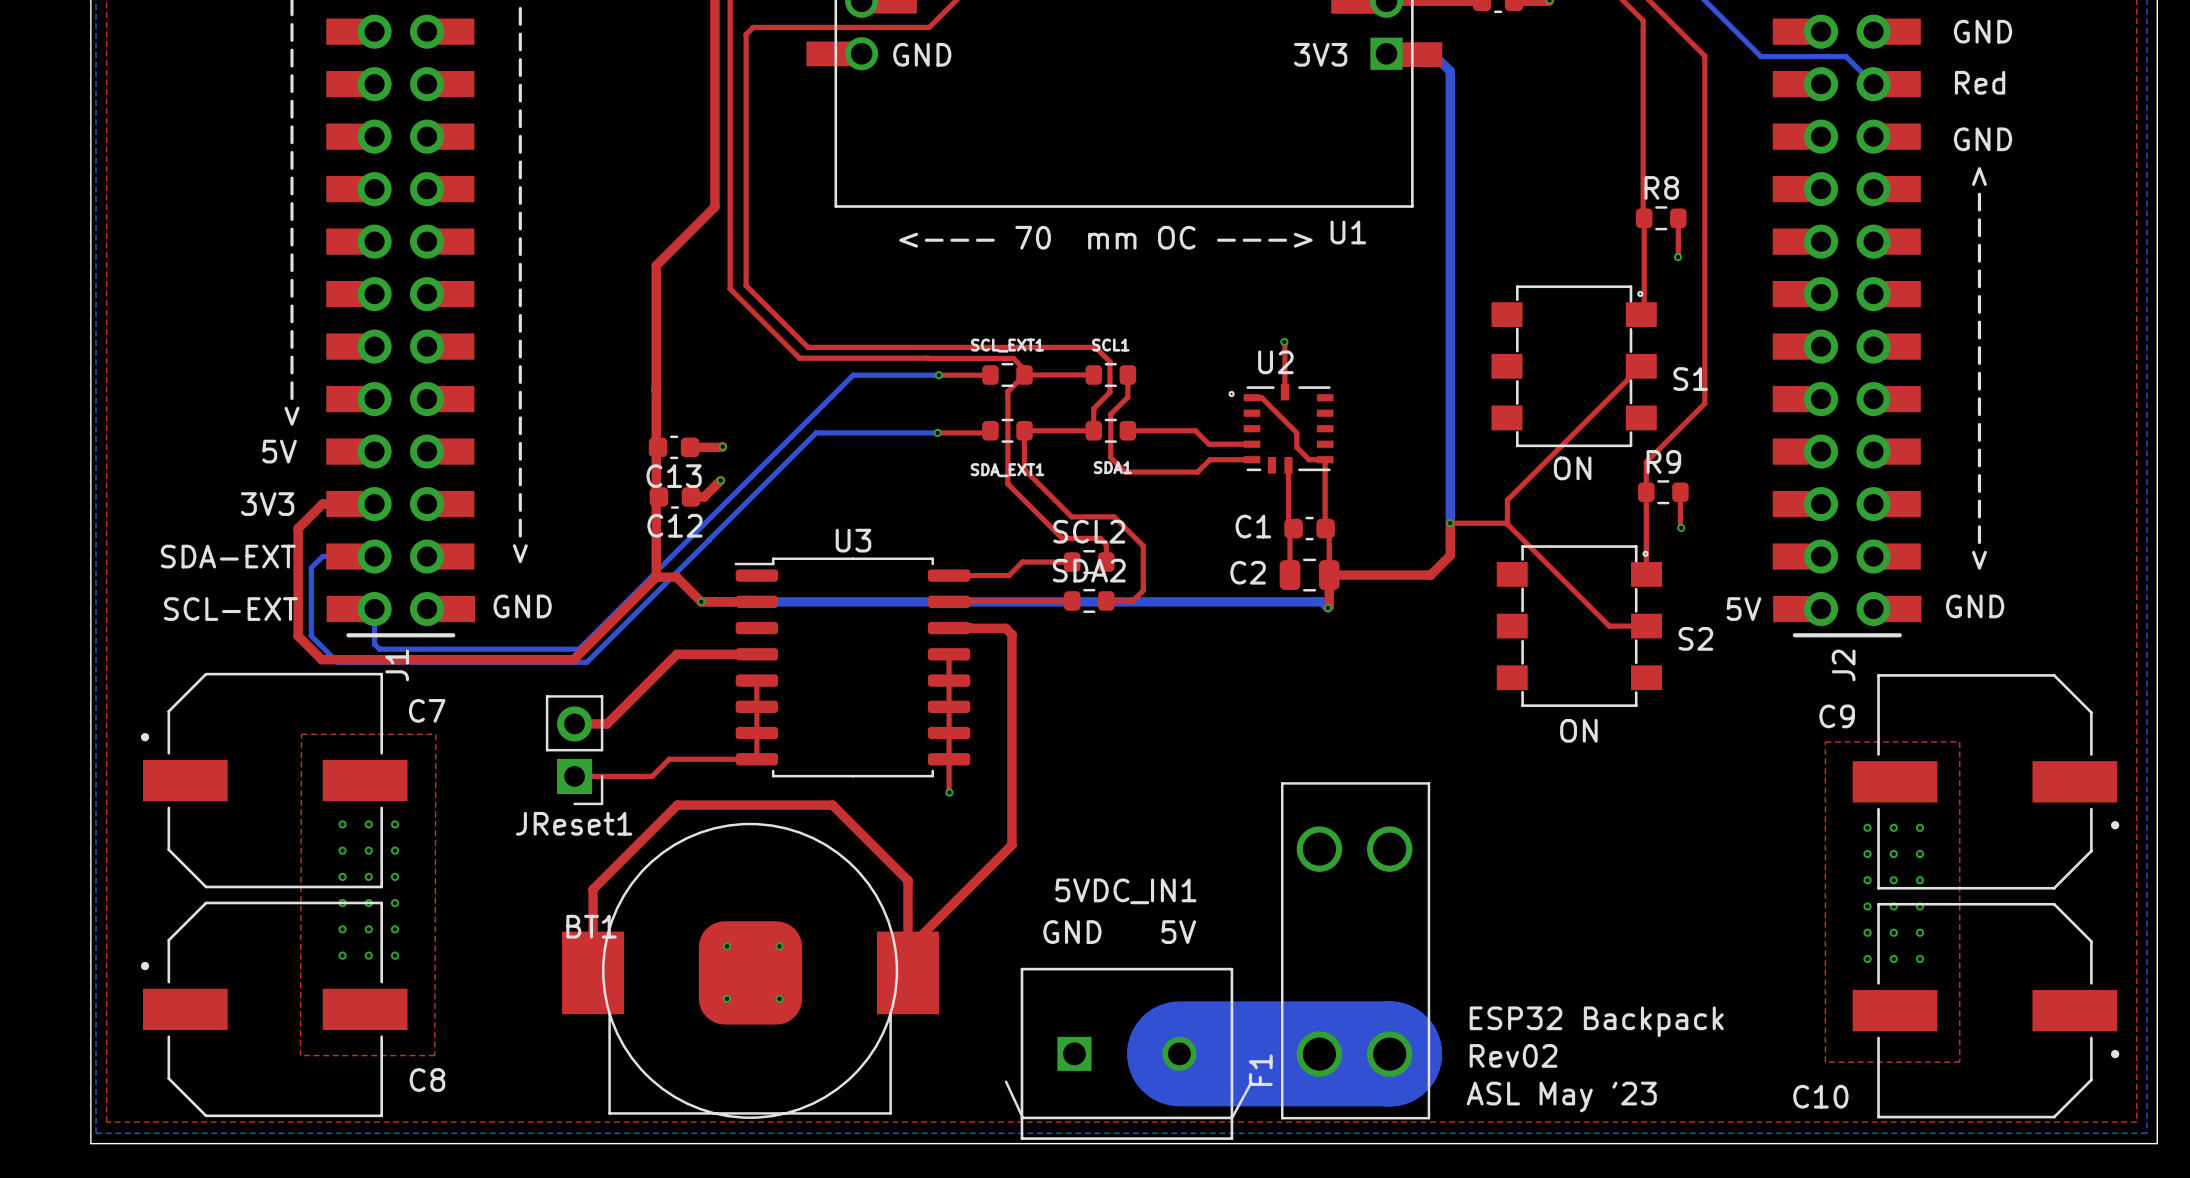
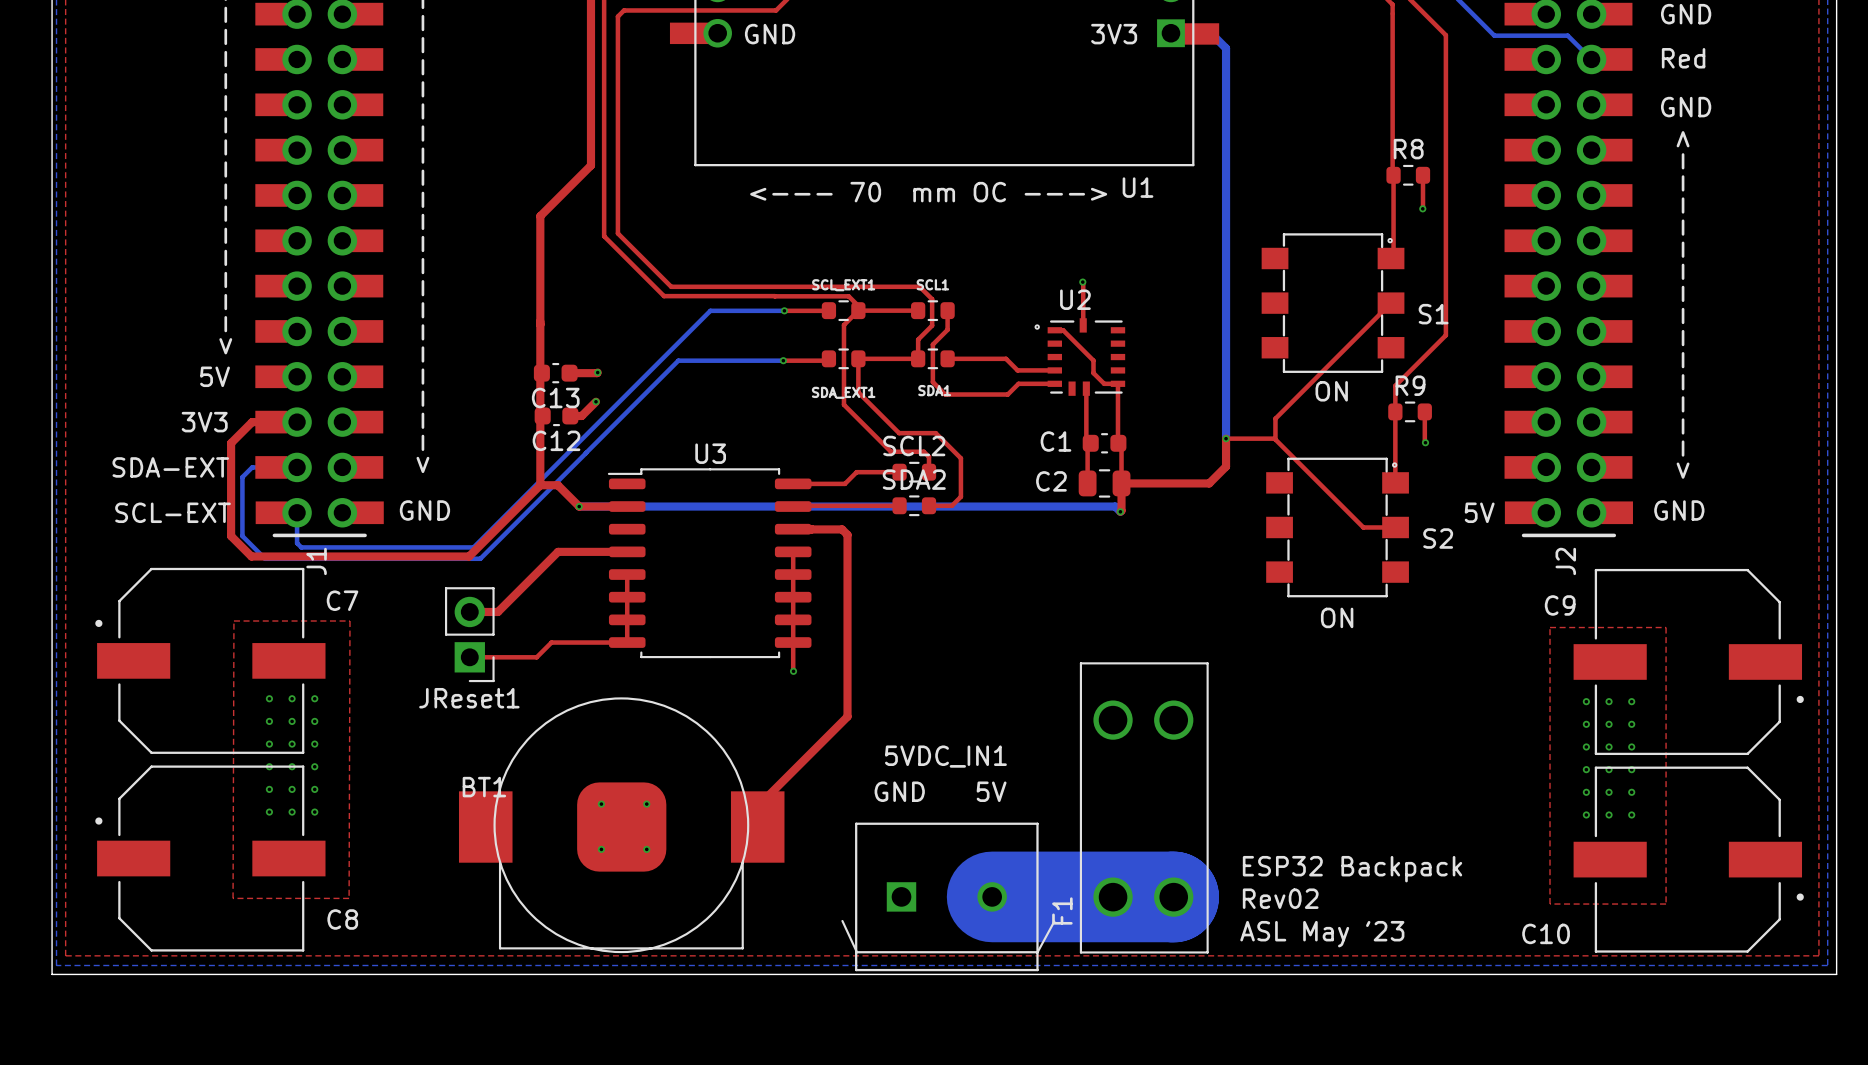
top track: (907, 949) (907, 880) (832, 805) (677, 805) (593, 889) (593, 972) -> none

